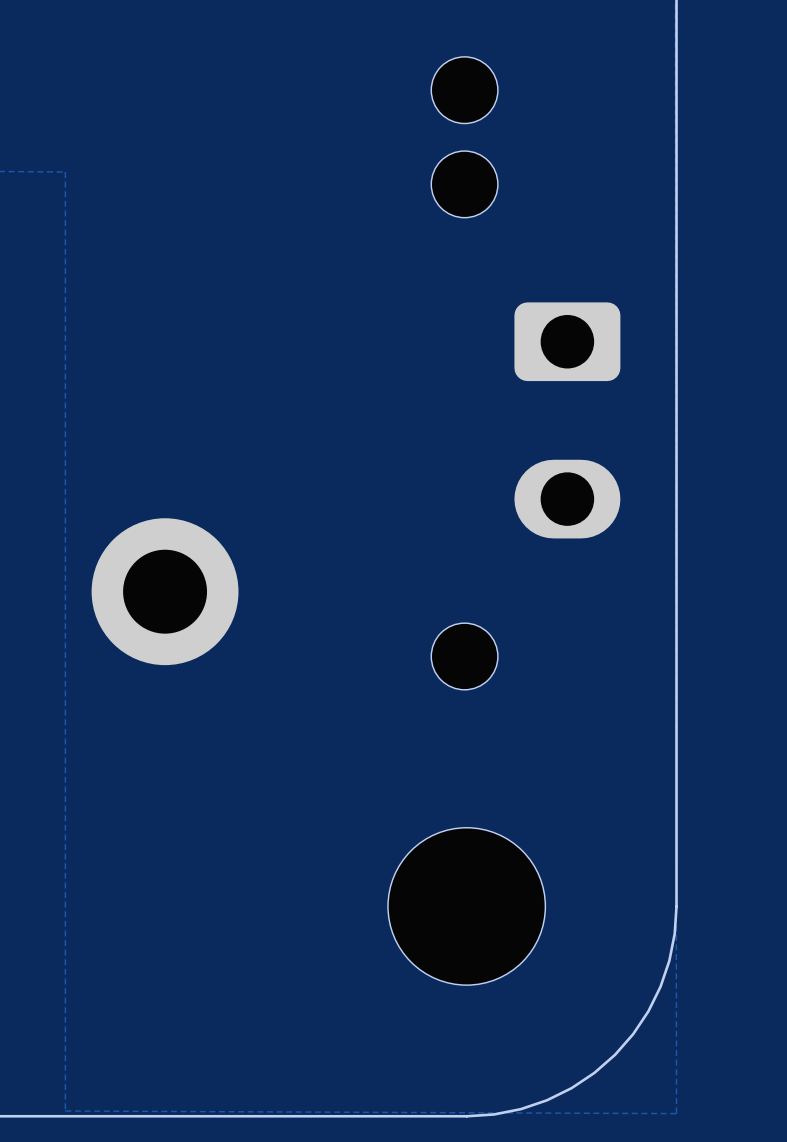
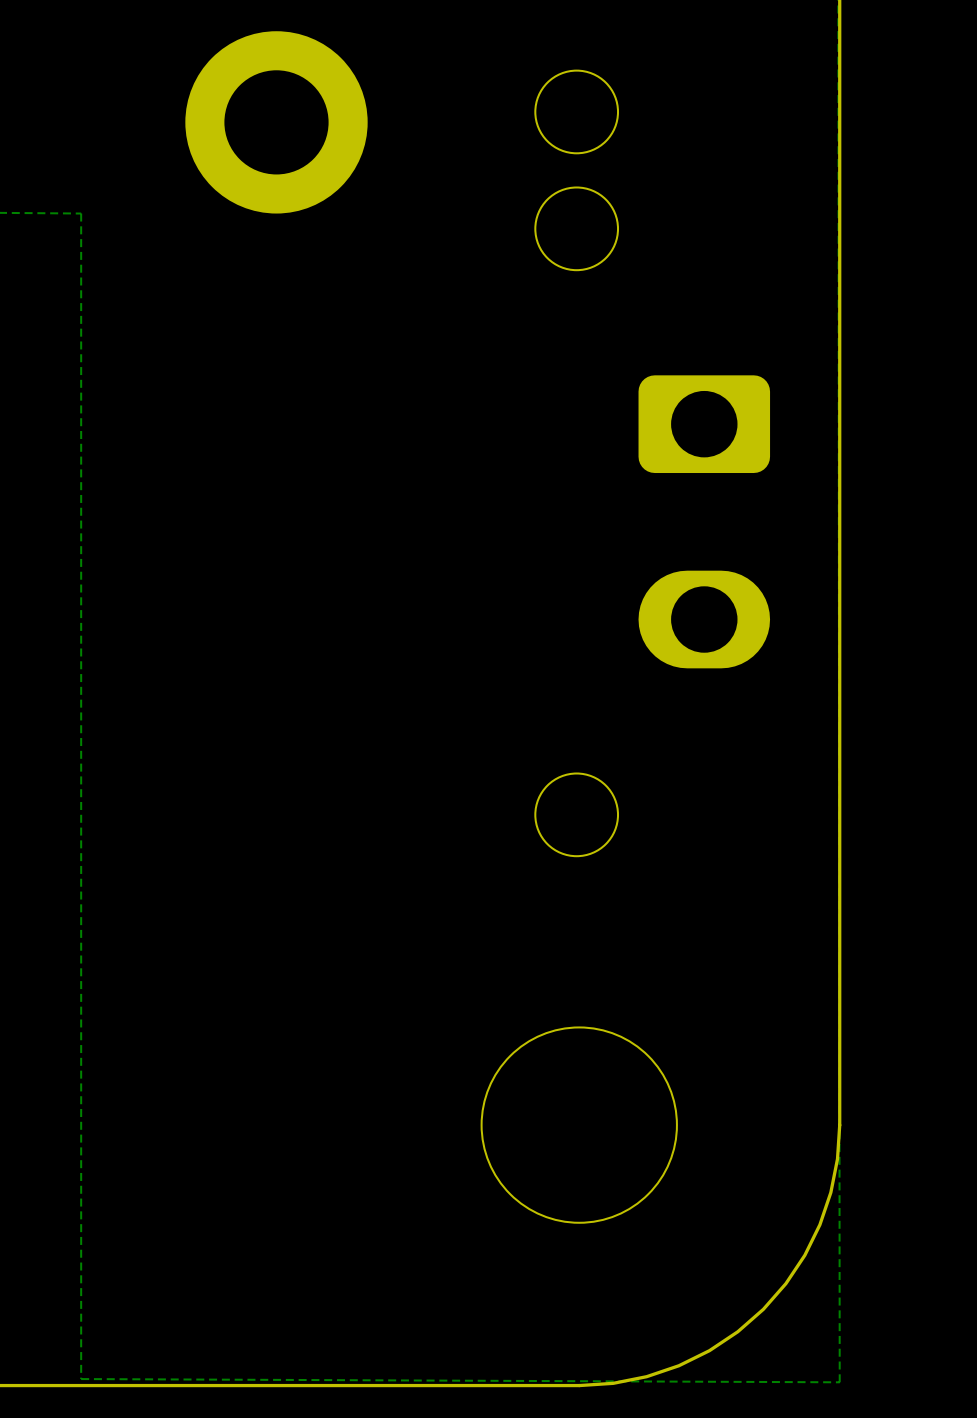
part position: (165, 591) -> (276, 122)

